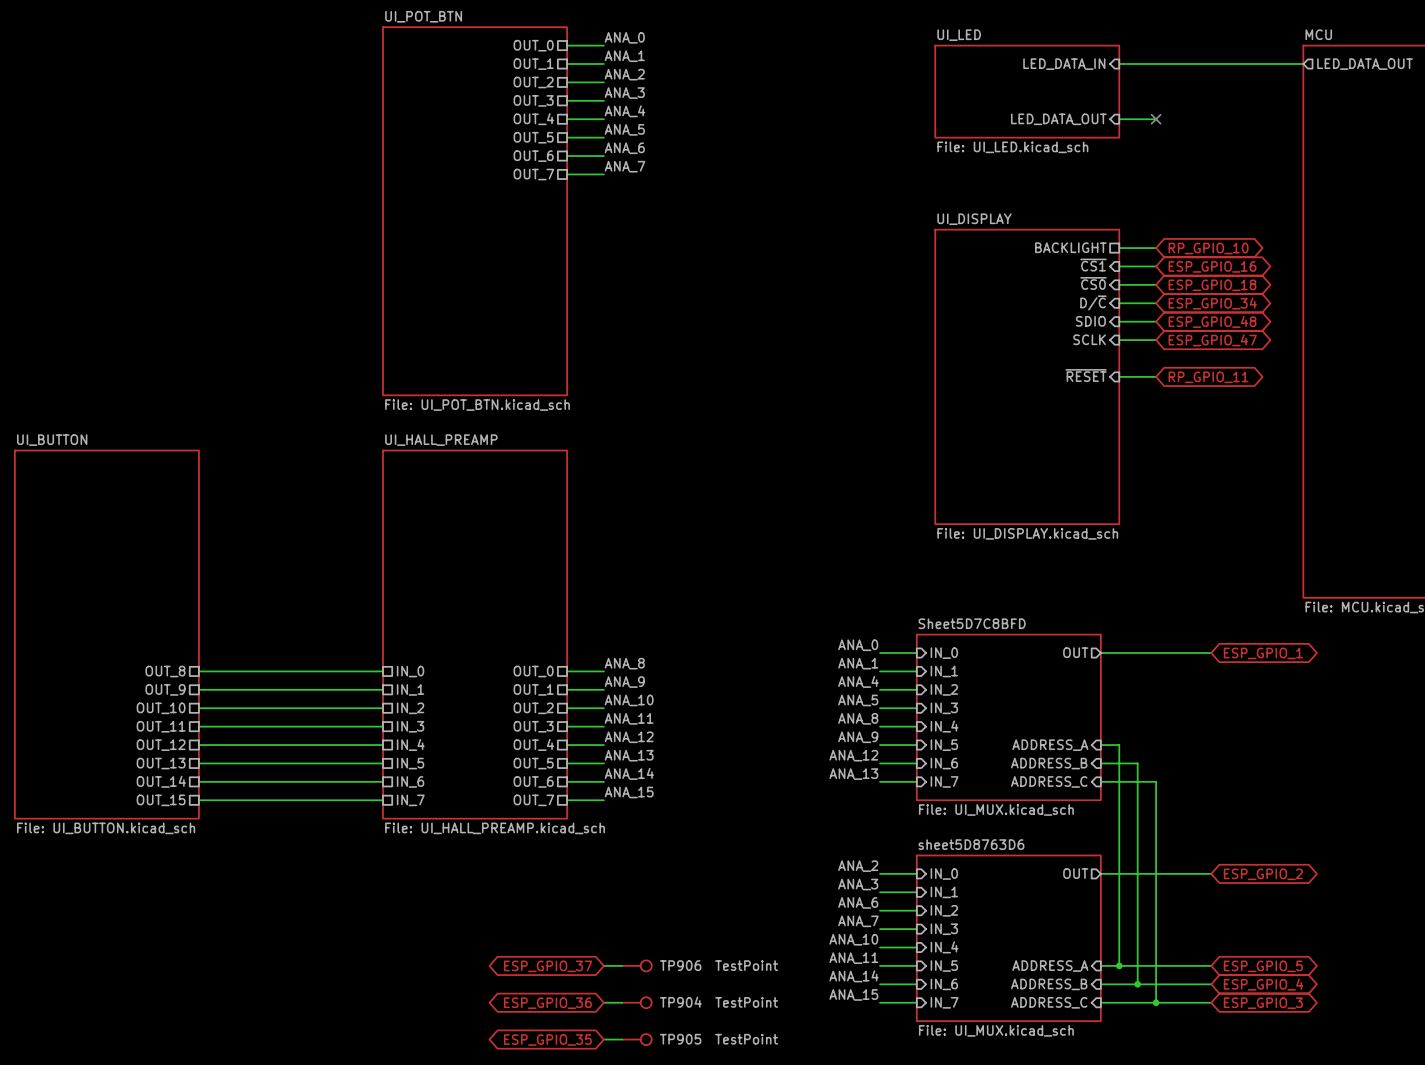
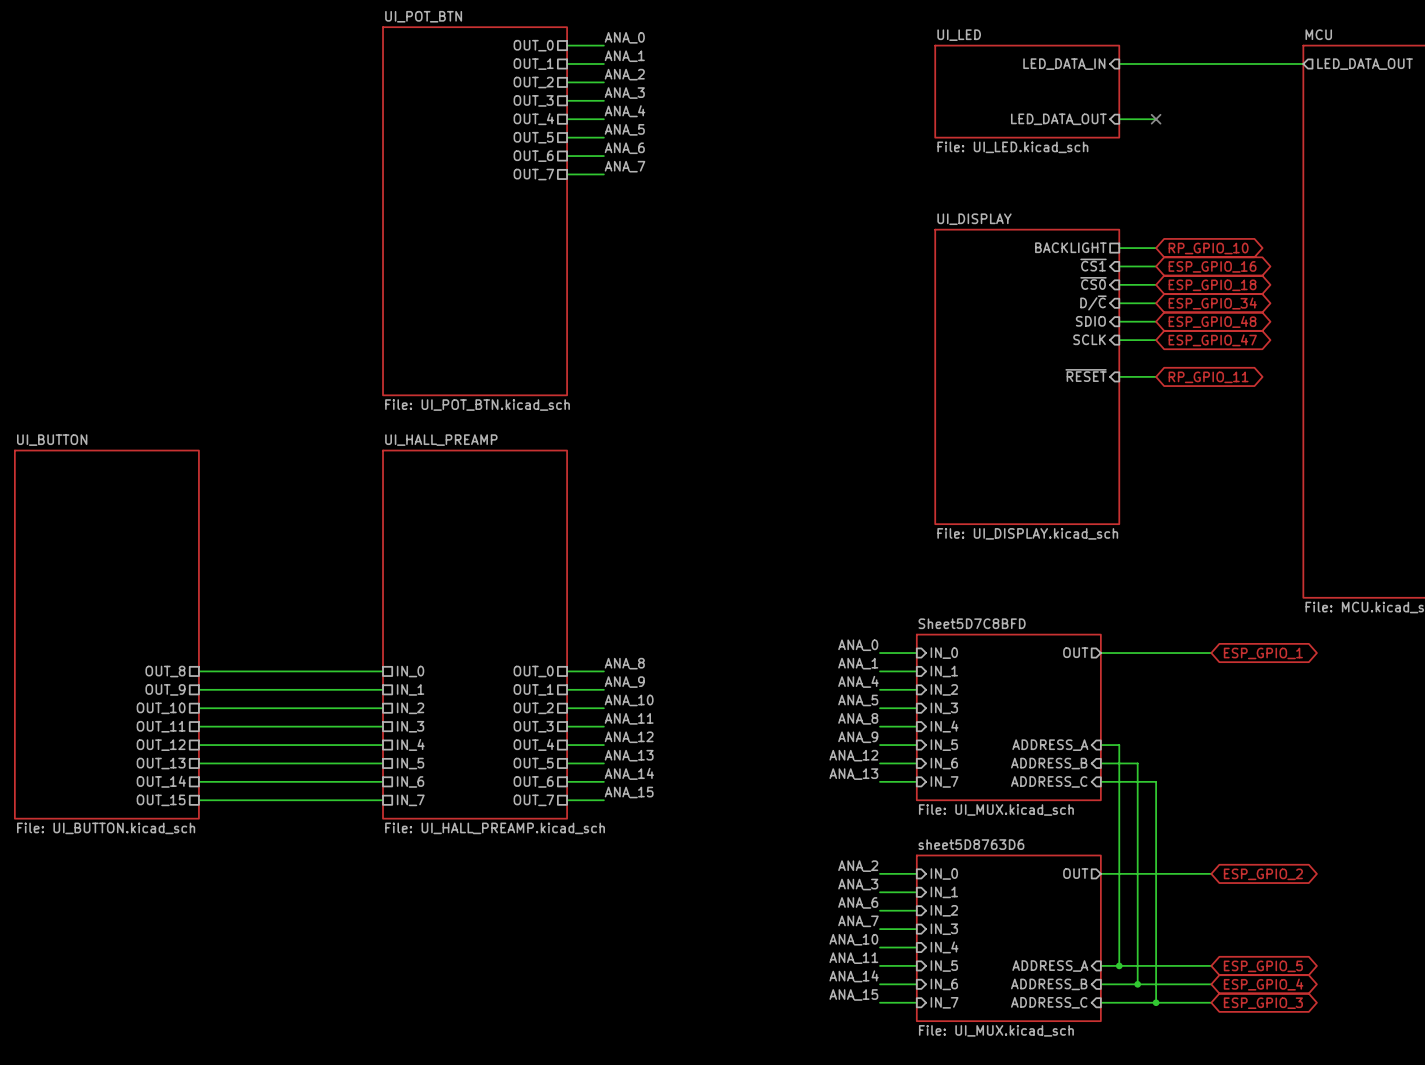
wire: (603, 965) (622, 965) -> none
TP906: TestPoint (637, 965) -> none
global label: ESP_GPIO_37 (548, 966) -> none
wire: (603, 1002) (622, 1002) -> none
TP904: TestPoint (637, 1002) -> none
global label: ESP_GPIO_36 (547, 1003) -> none
global label: ESP_GPIO_35 (547, 1039) -> none
wire: (603, 1039) (622, 1039) -> none
TP905: TestPoint (637, 1039) -> none

